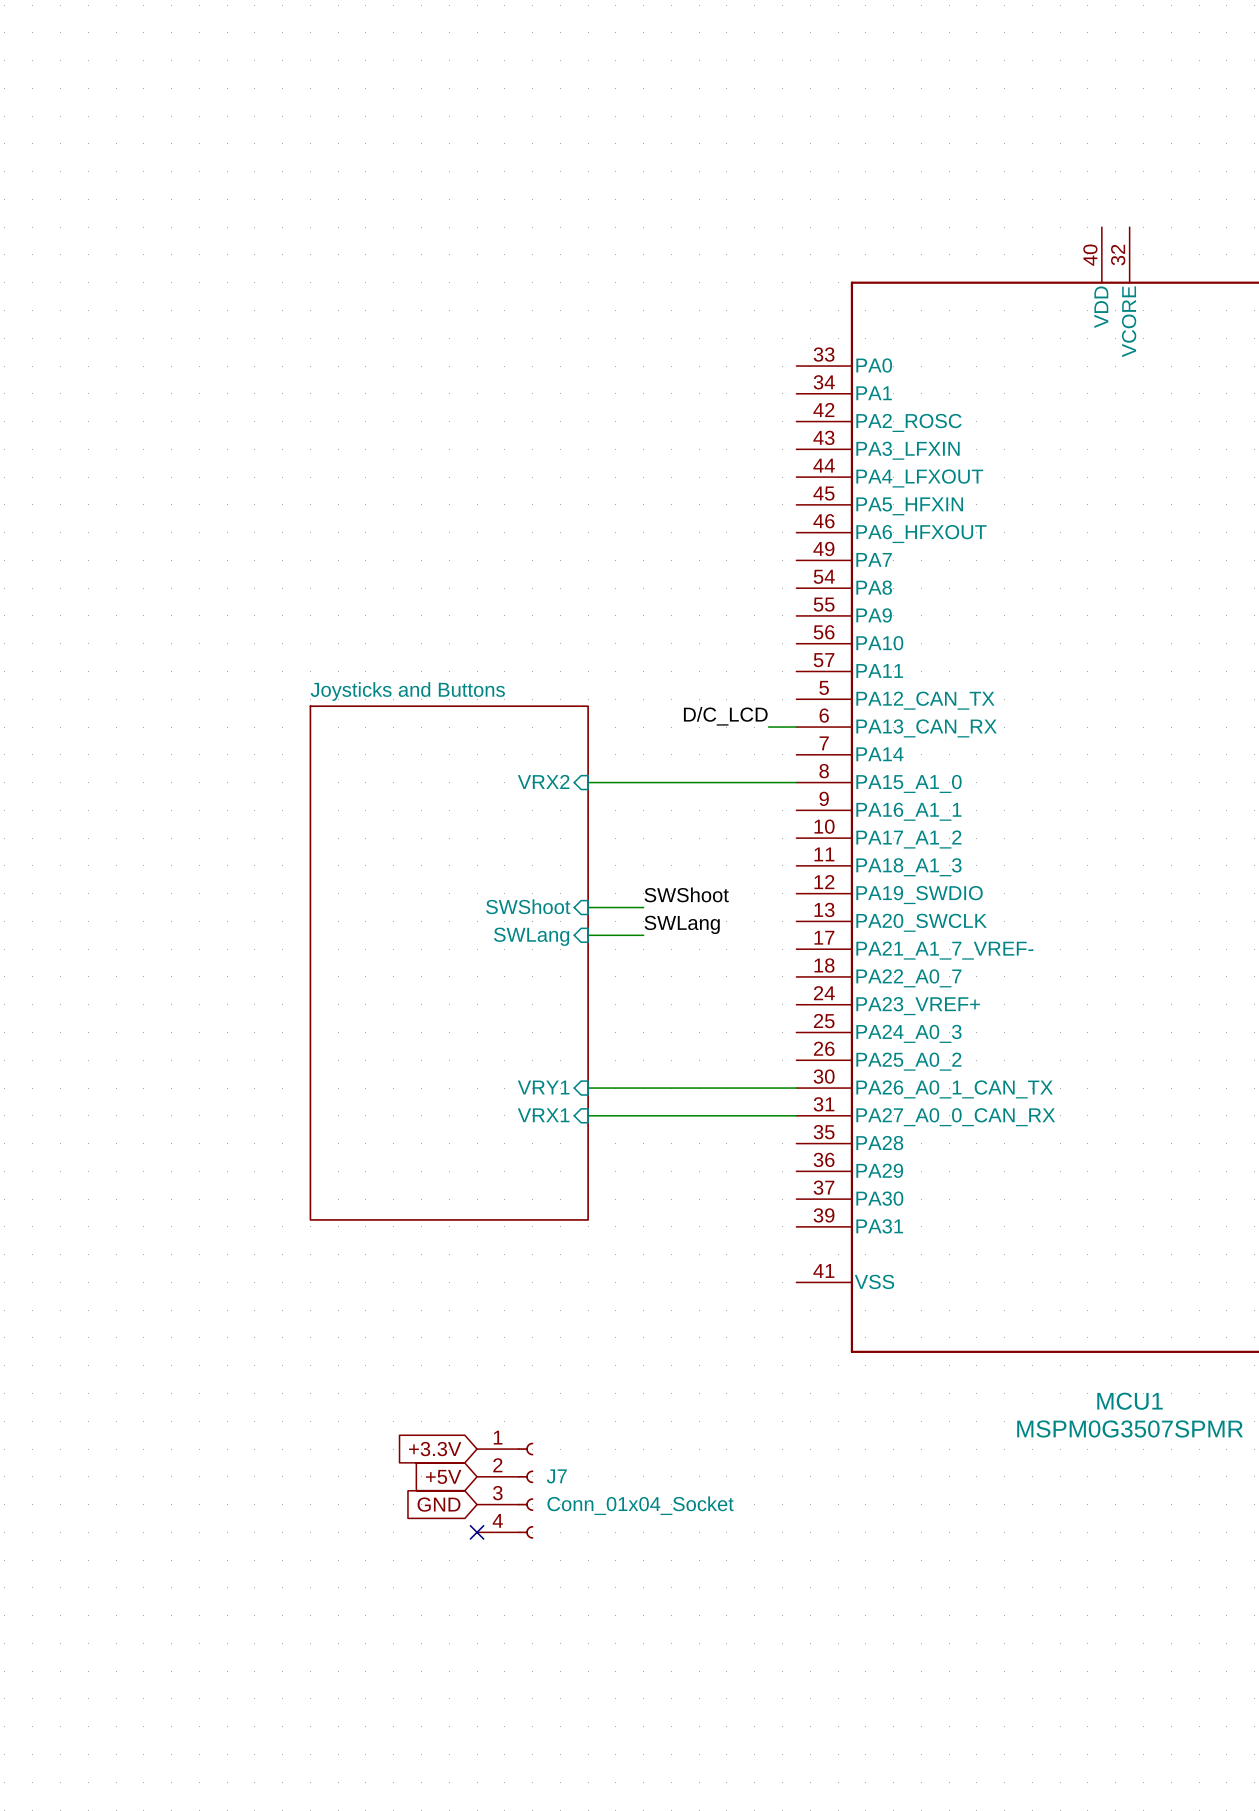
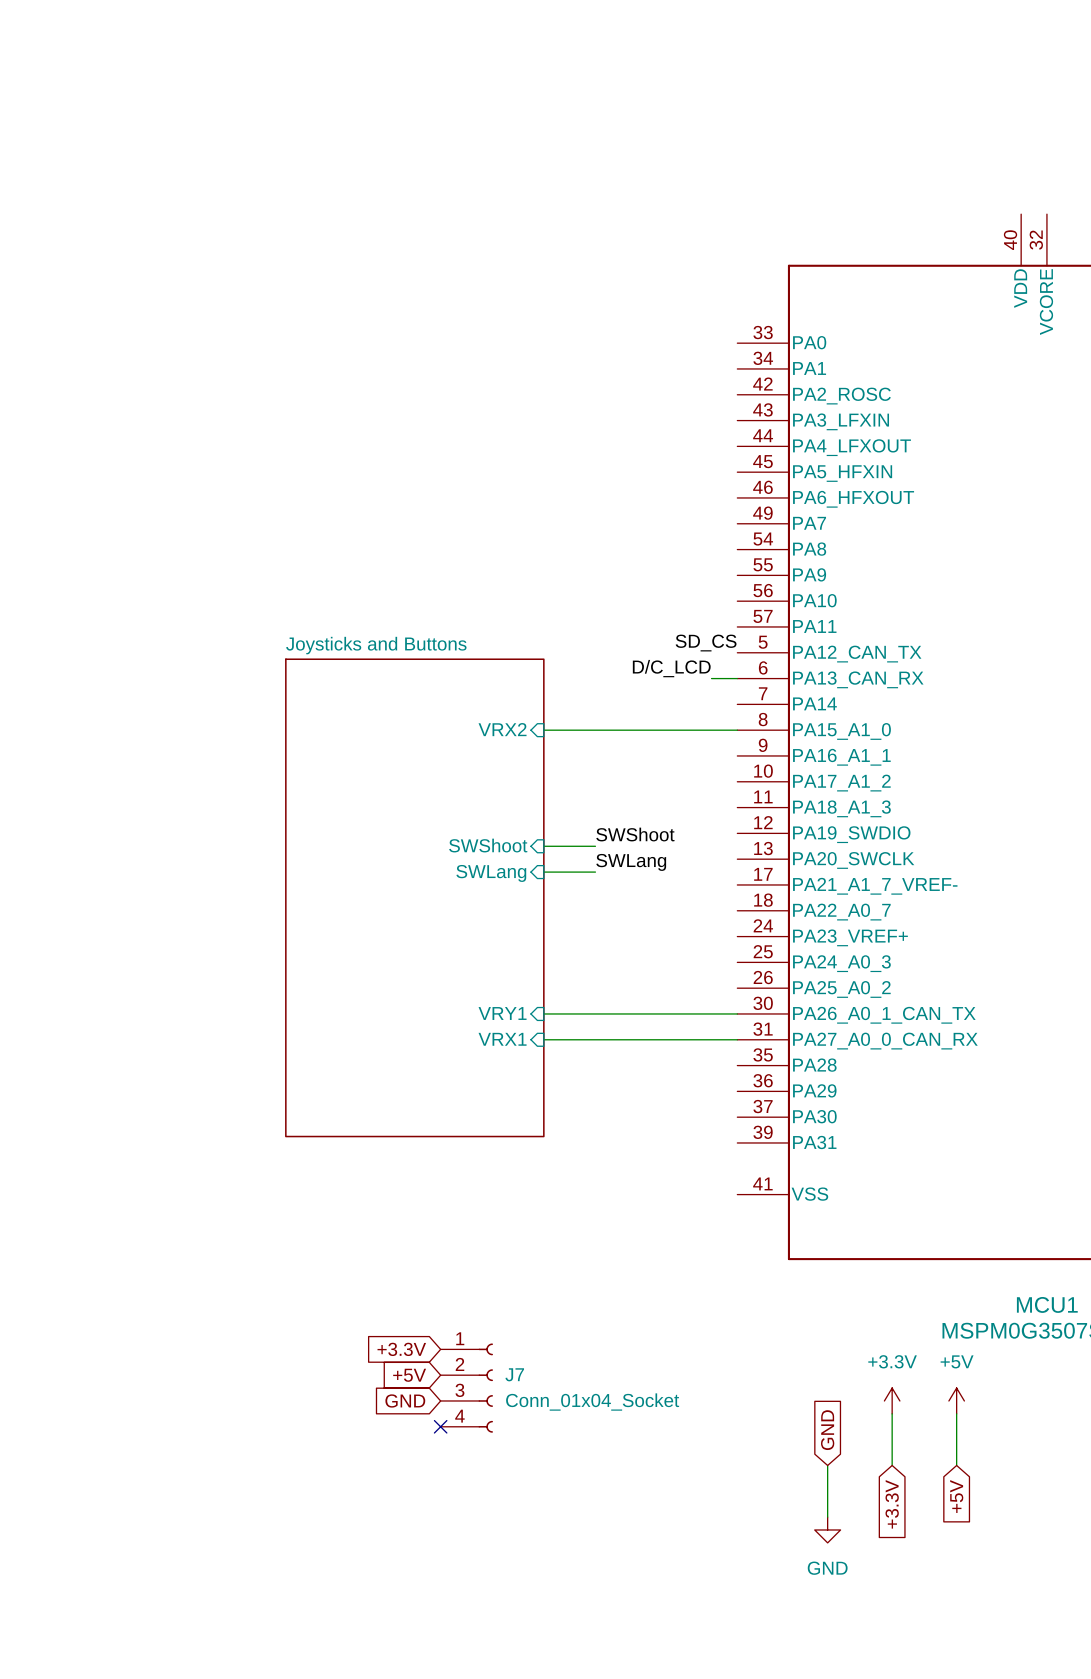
label: none -> SD_CS (706, 643)
power symbol: none -> +3.3V (892, 1400)
power symbol: none -> +5V (956, 1400)
wire: none -> (892, 1413) (892, 1465)
wire: none -> (956, 1413) (956, 1465)
global label: none -> GND (827, 1430)
wire: none -> (827, 1465) (827, 1517)
global label: none -> +5V (956, 1496)
global label: none -> +3.3V (892, 1504)
power symbol: none -> GND (827, 1529)

